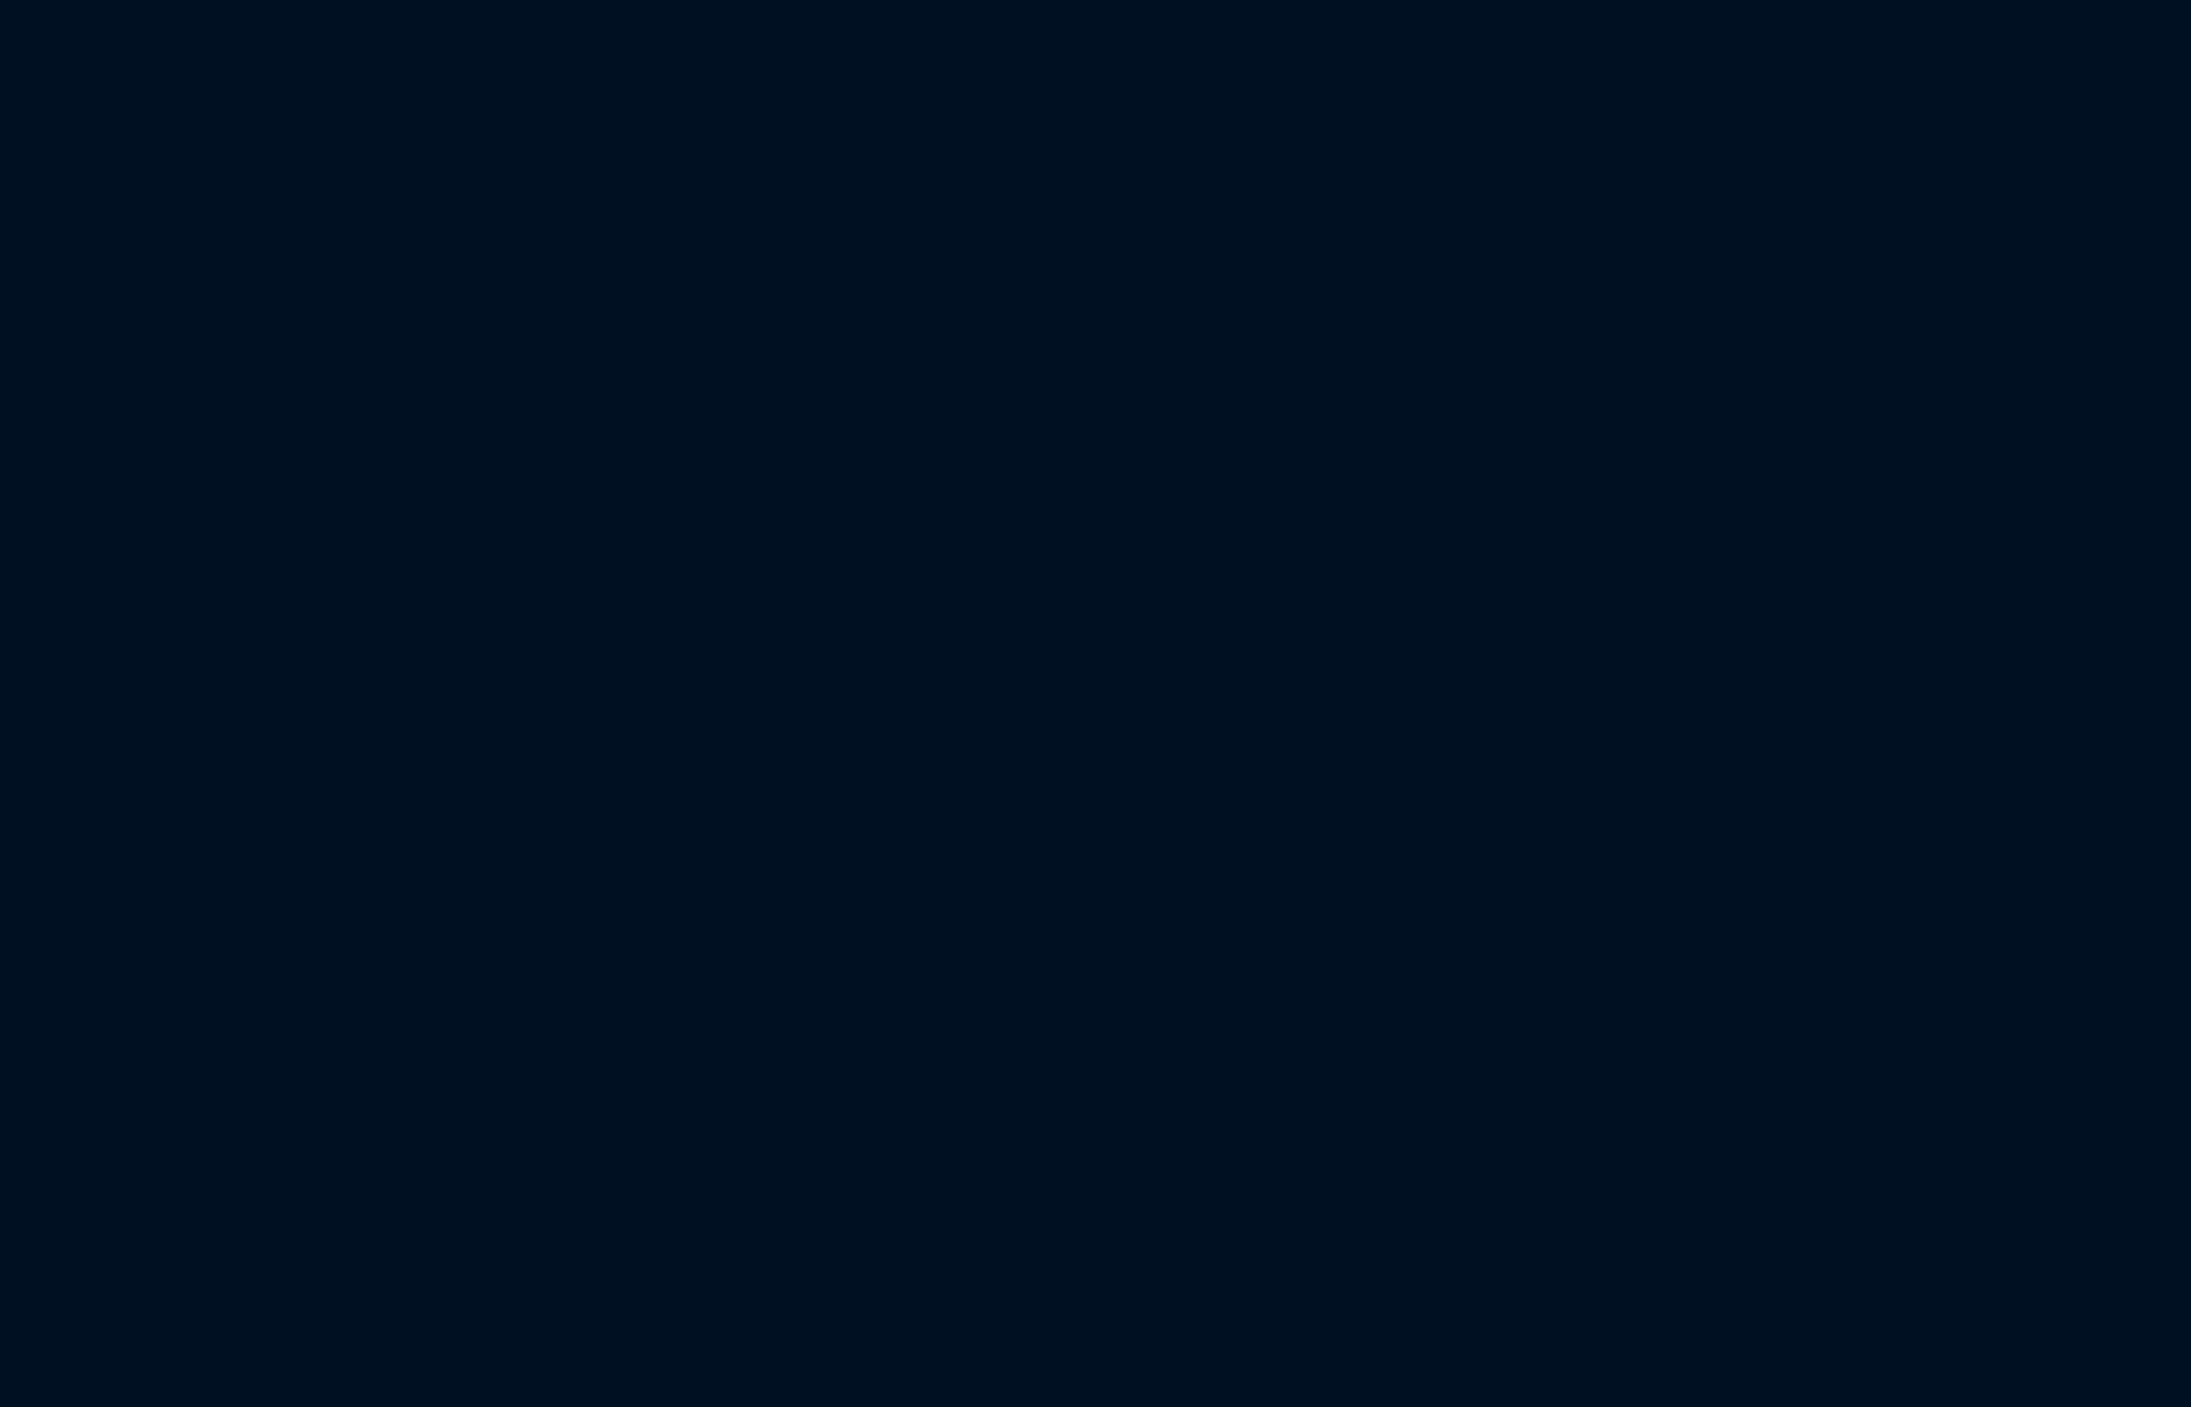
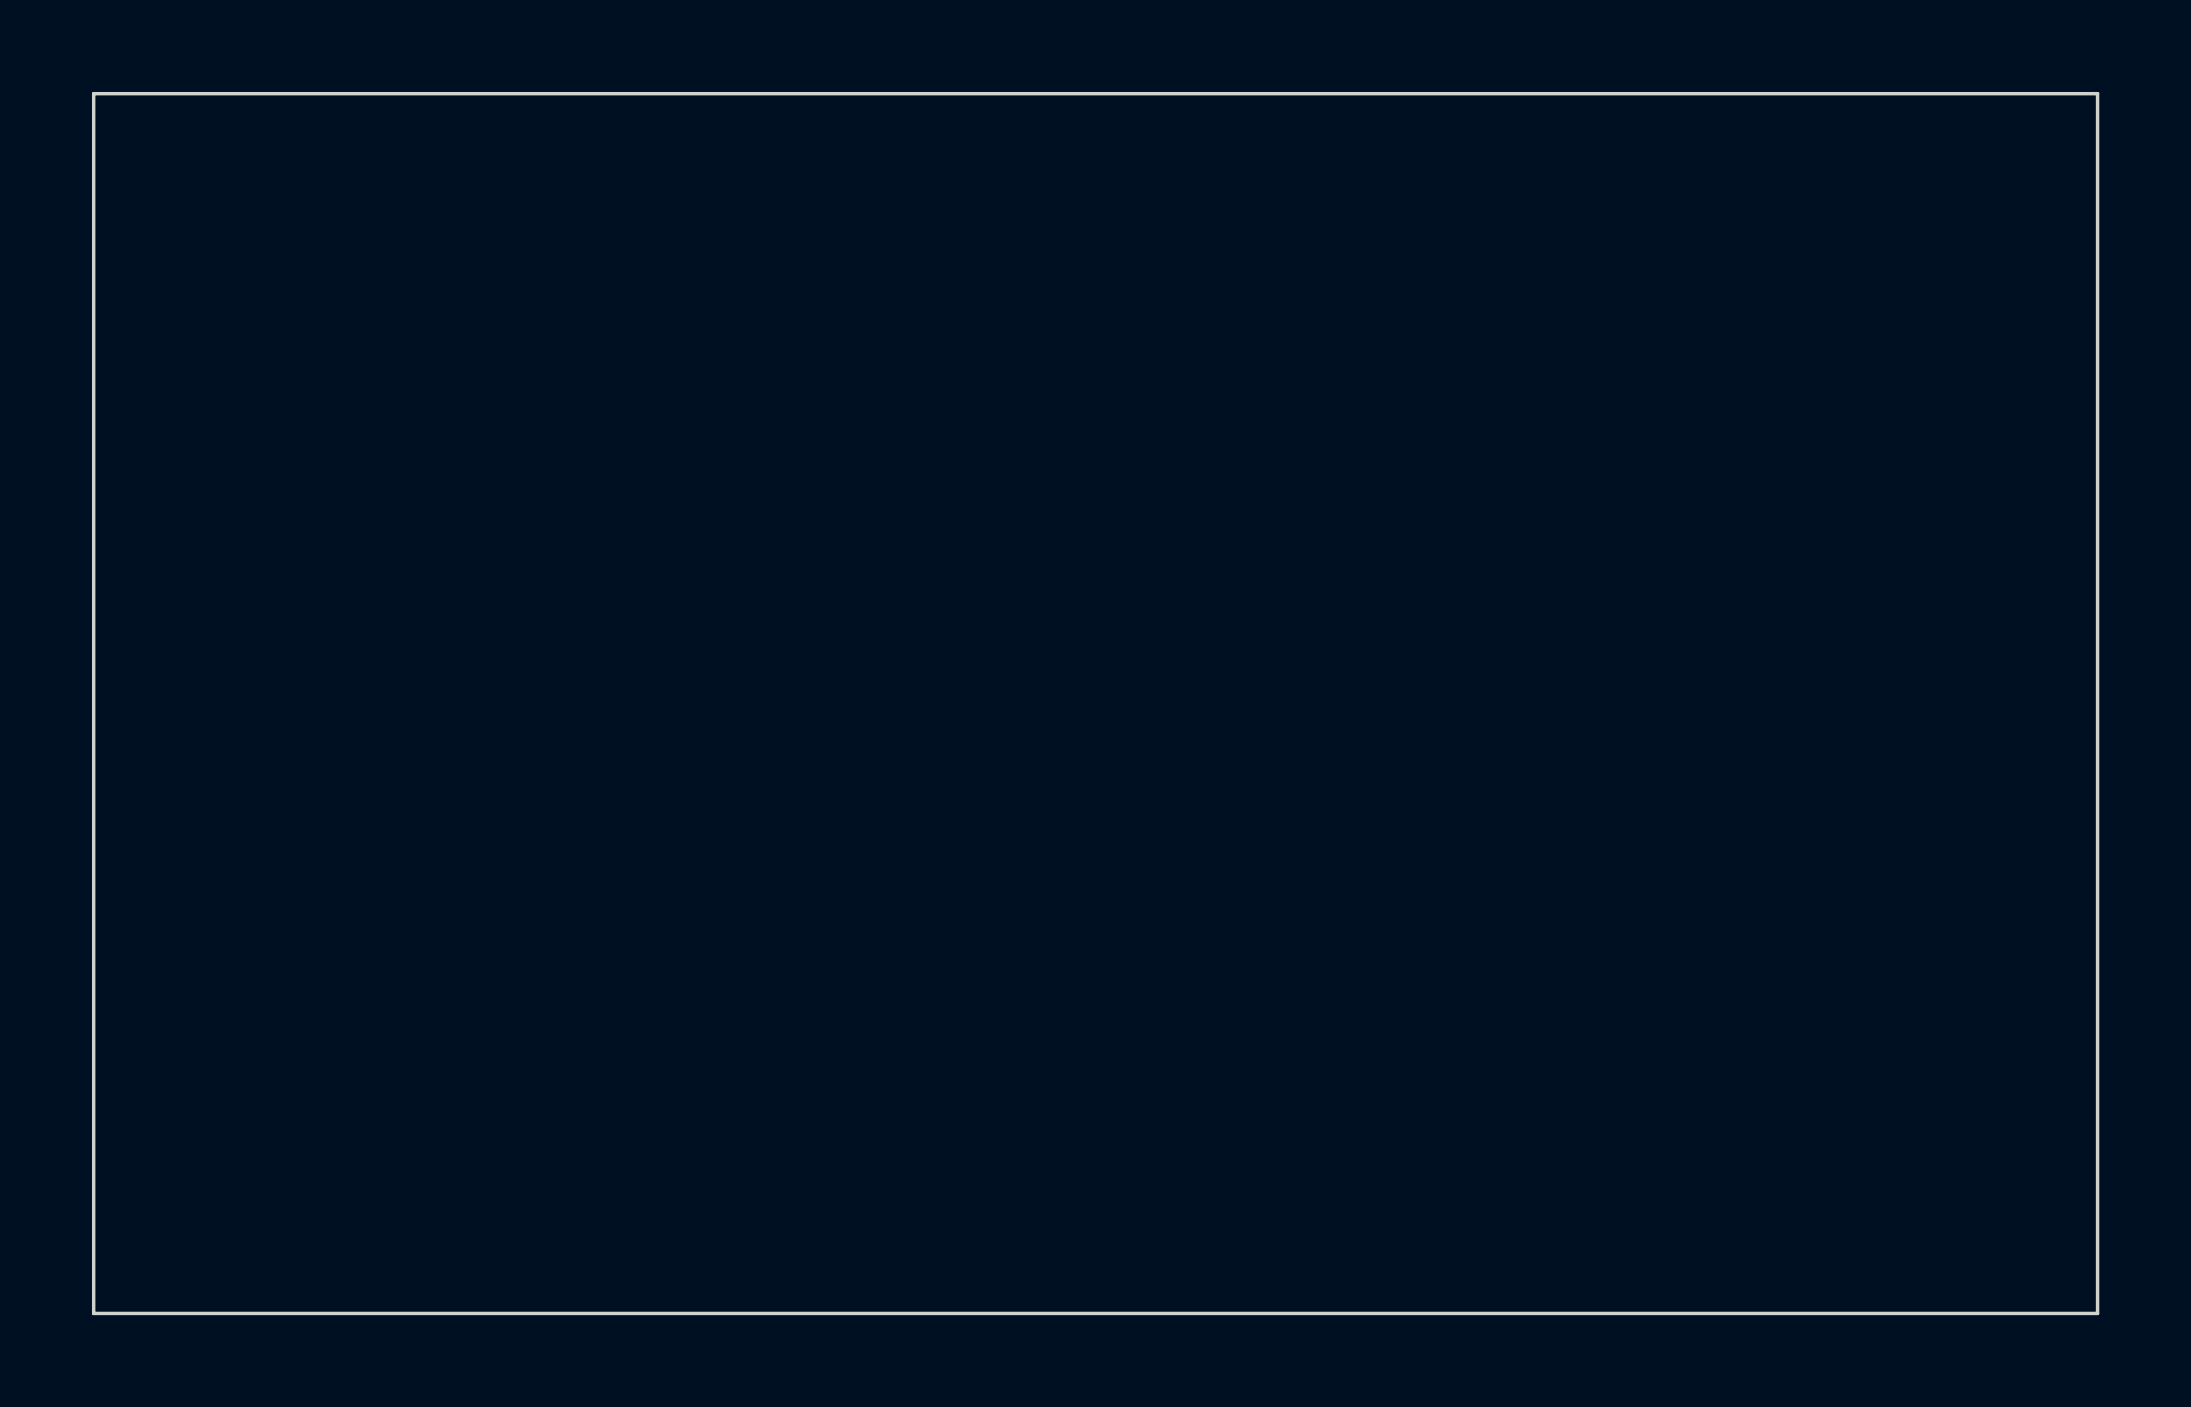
board edge: none -> (2097, 93) (93, 93) (93, 1313) (2097, 1313) (2097, 93)

